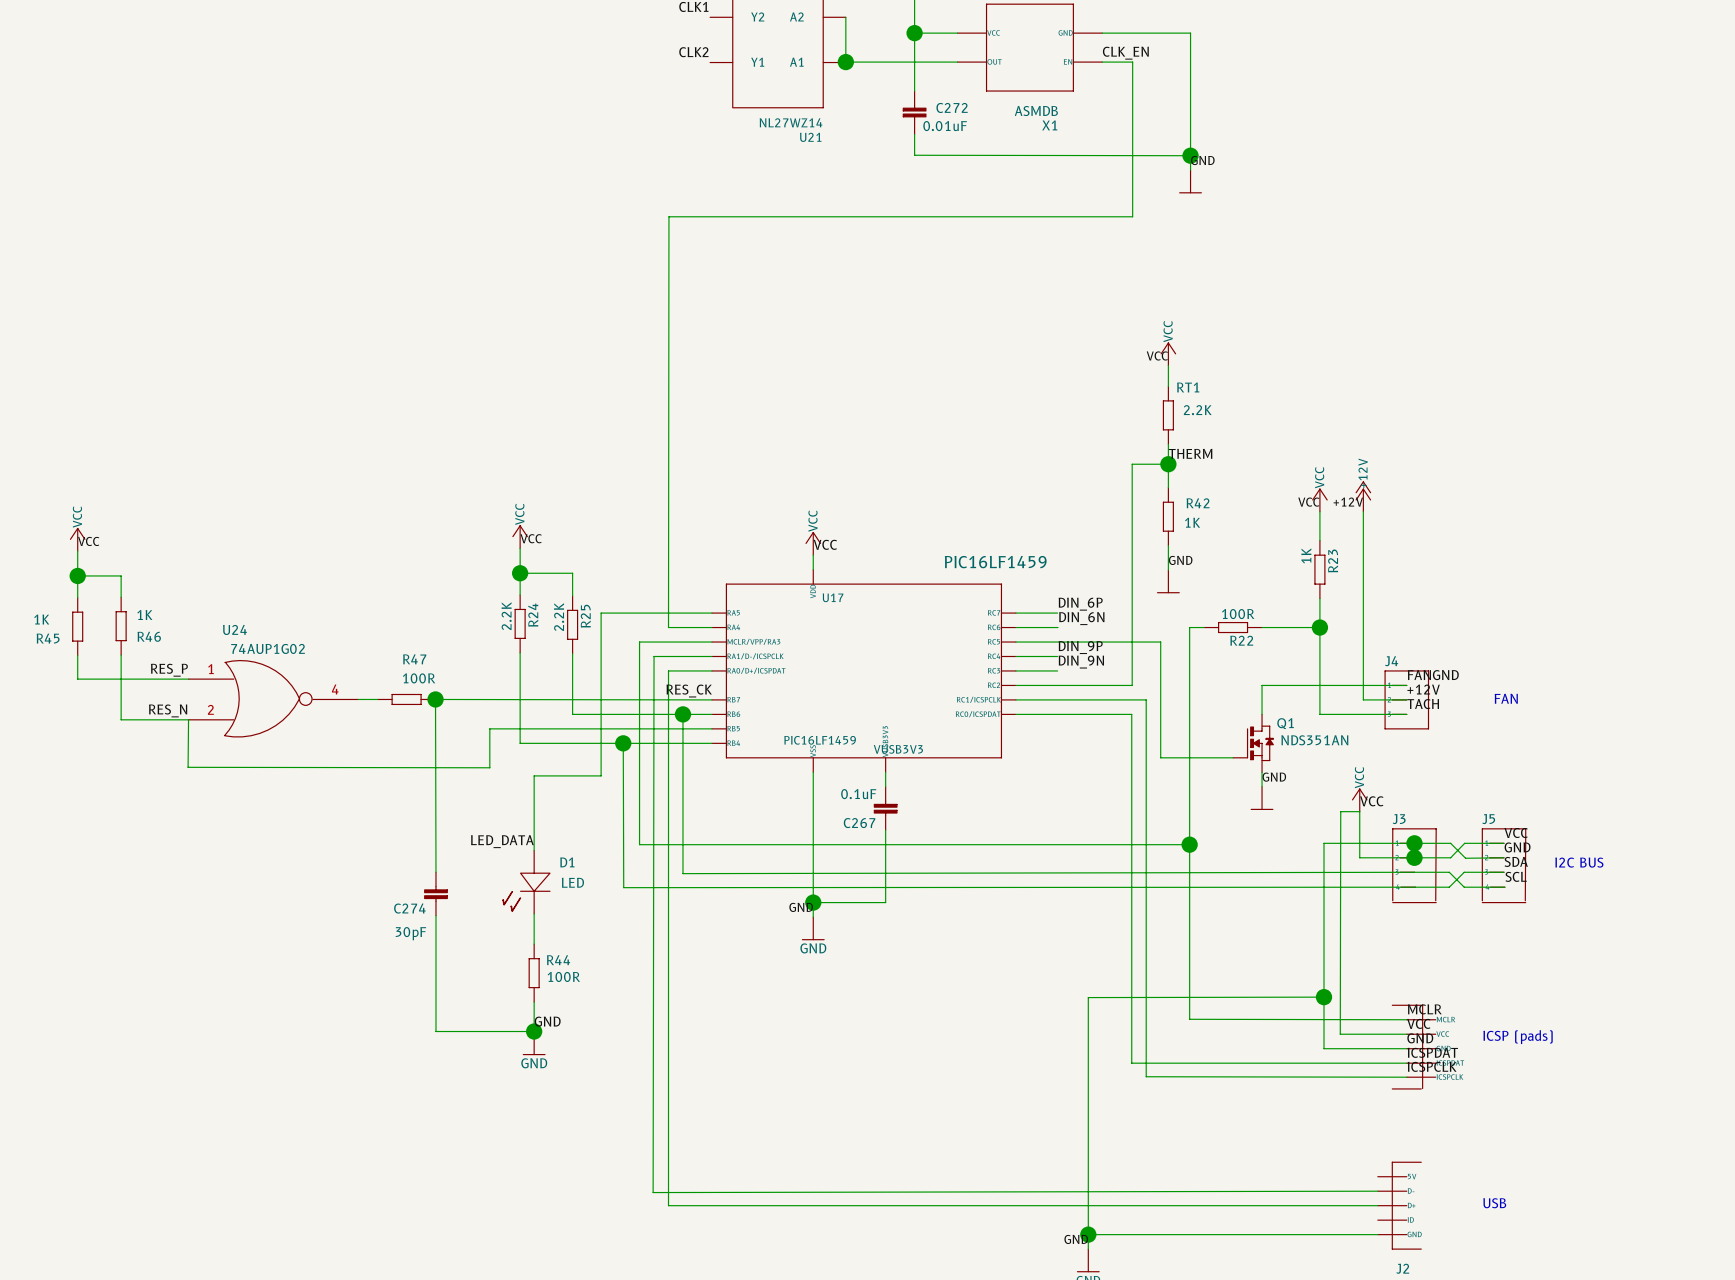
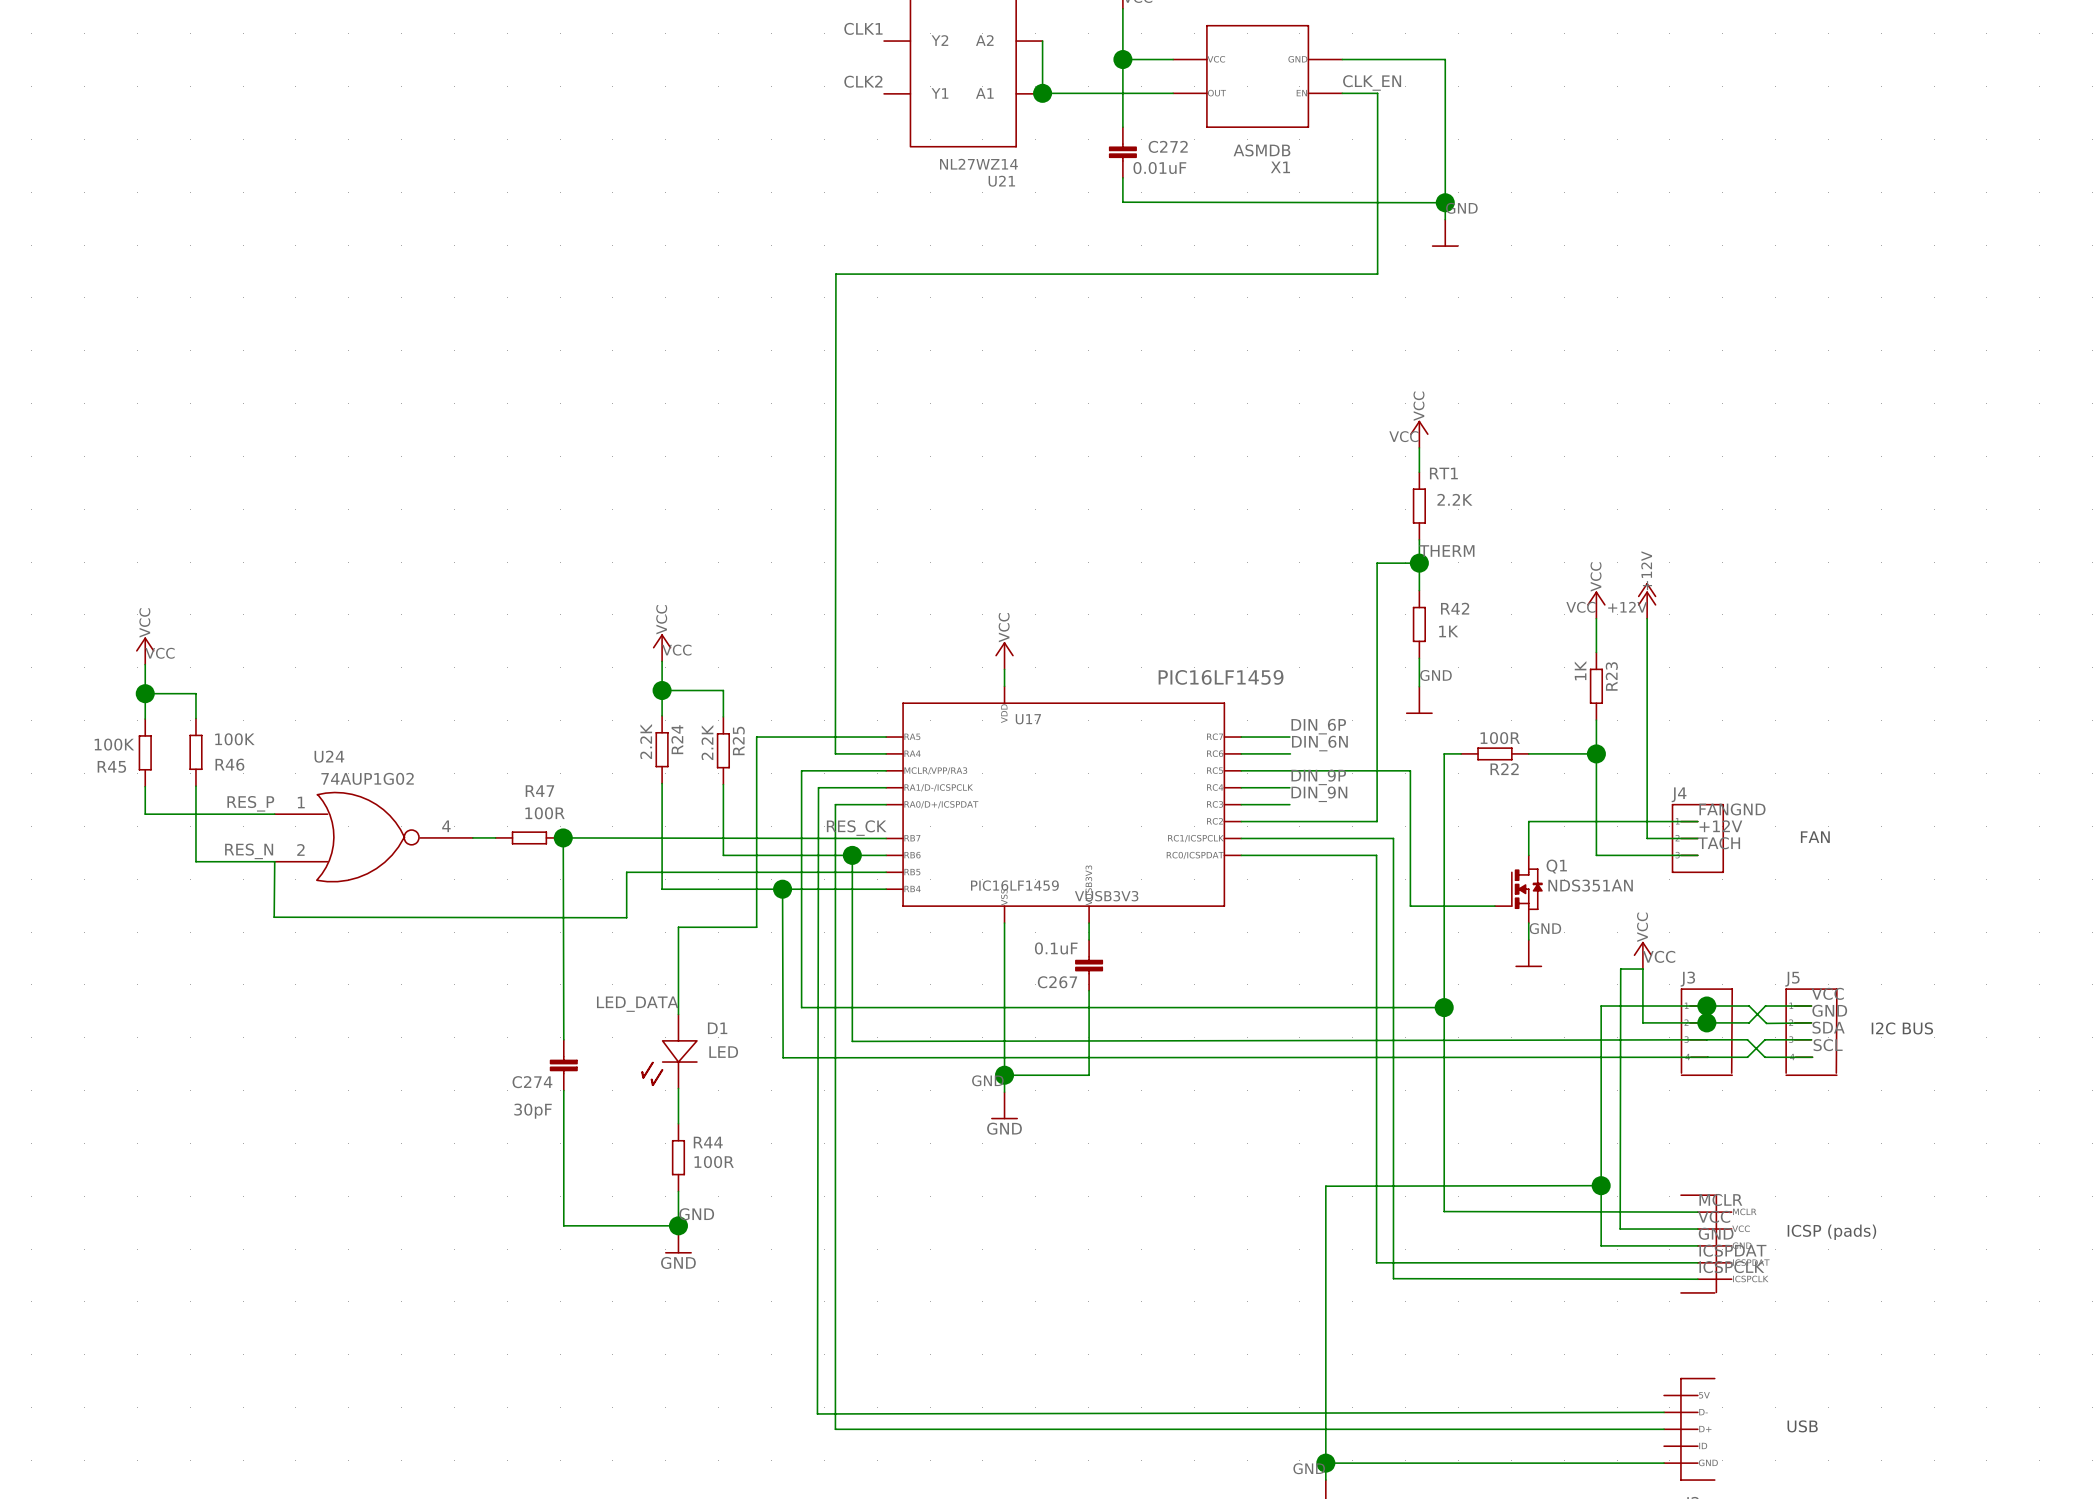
label: VCC (825, 544) -> none
R46 value: 1K (144, 615) -> 100K (234, 739)
R45 value: 1K (41, 619) -> 100K (114, 744)

